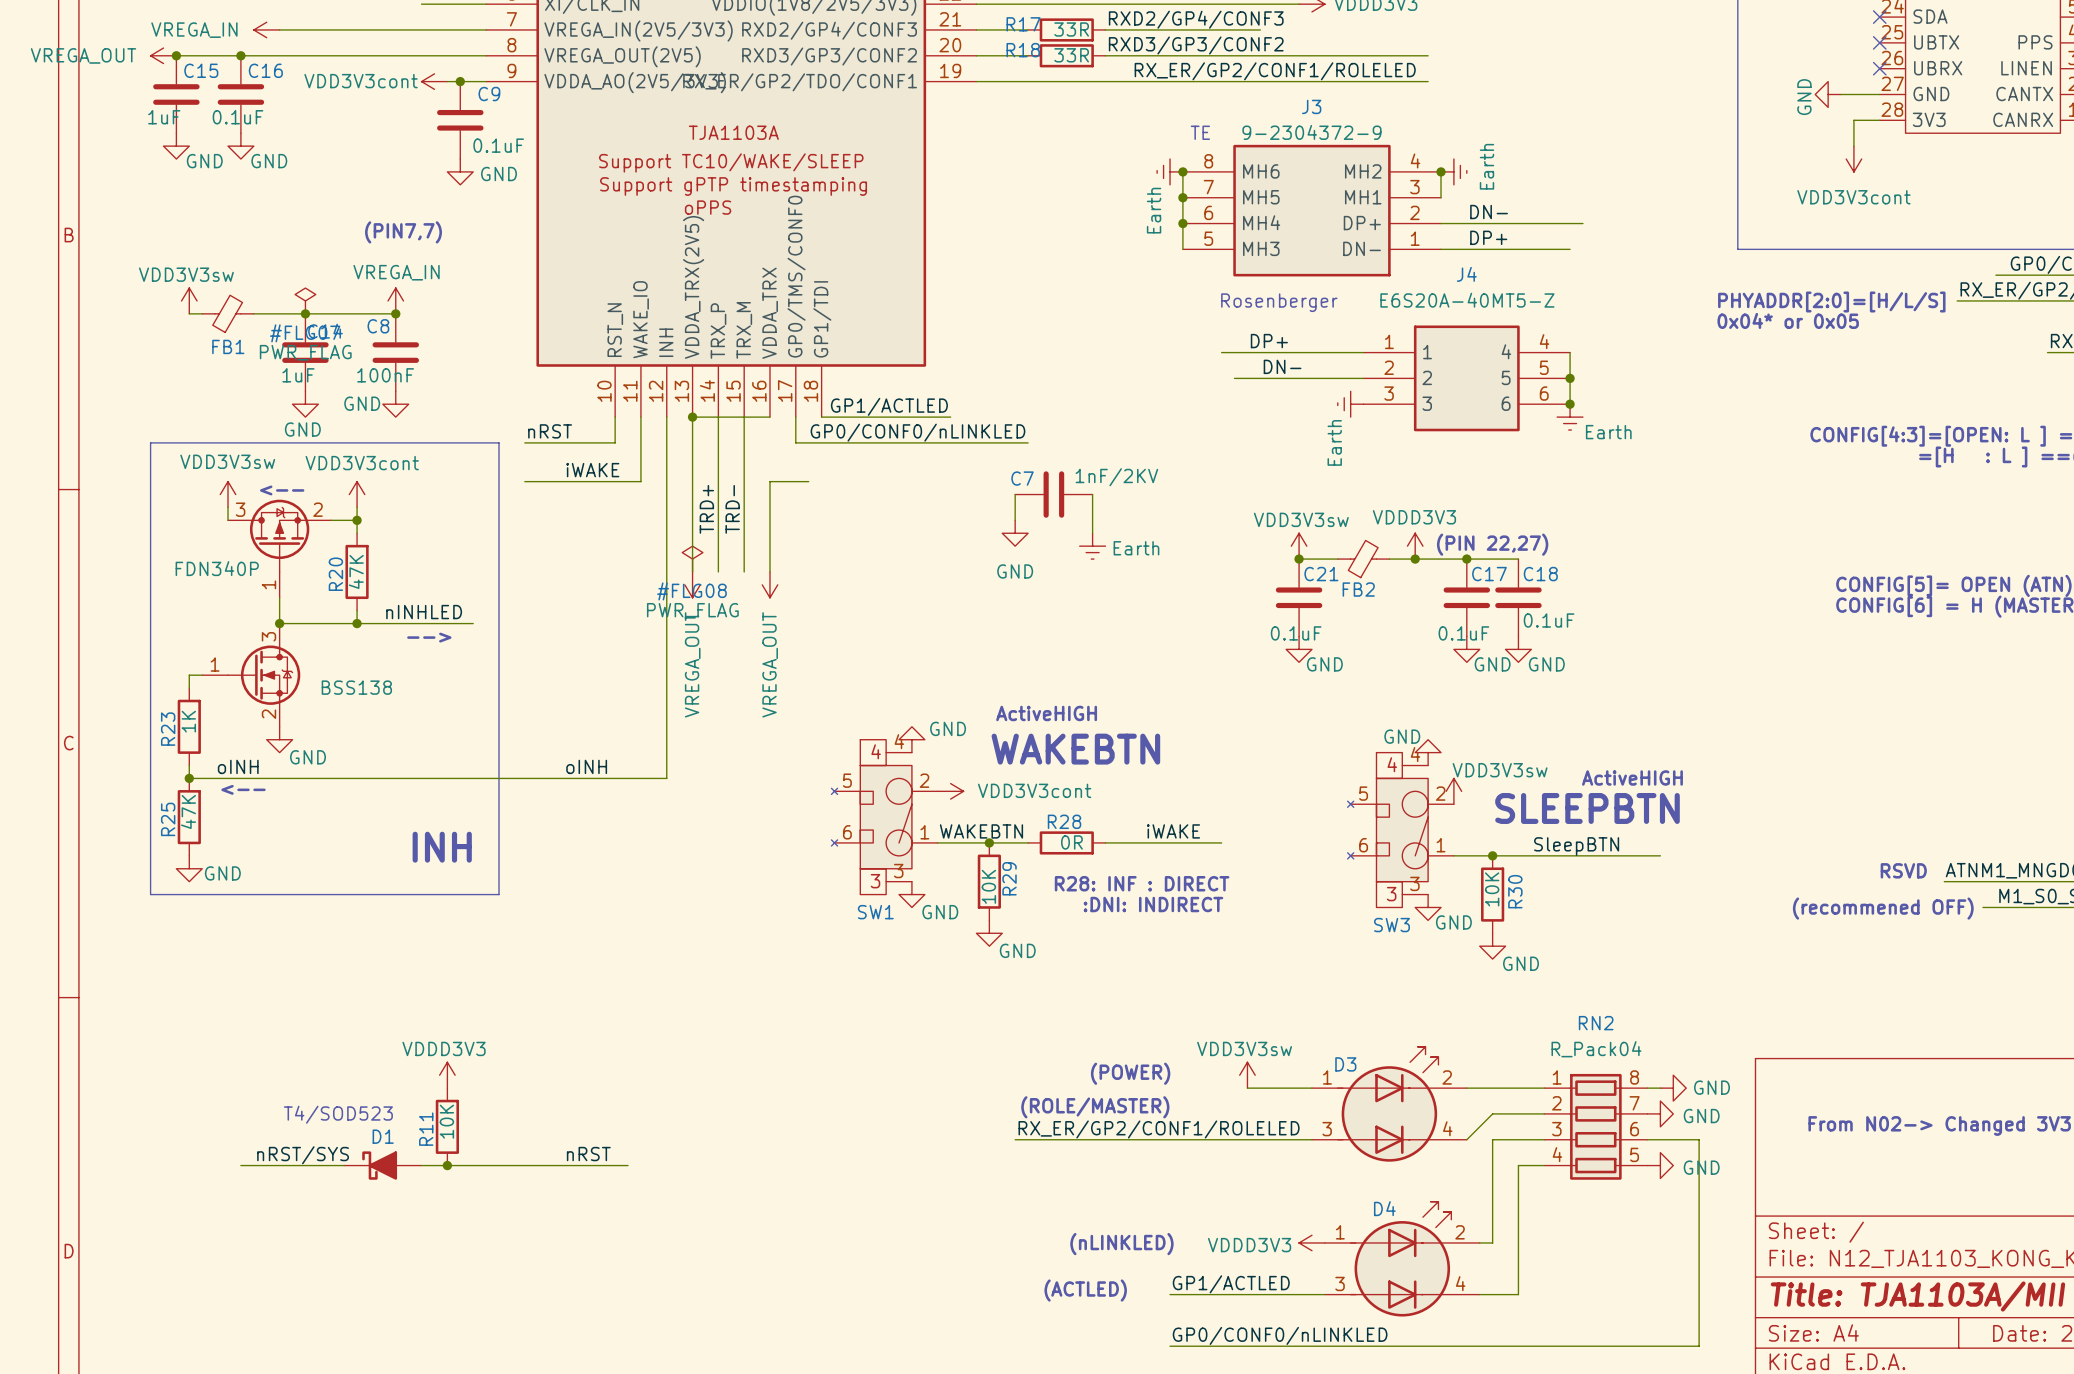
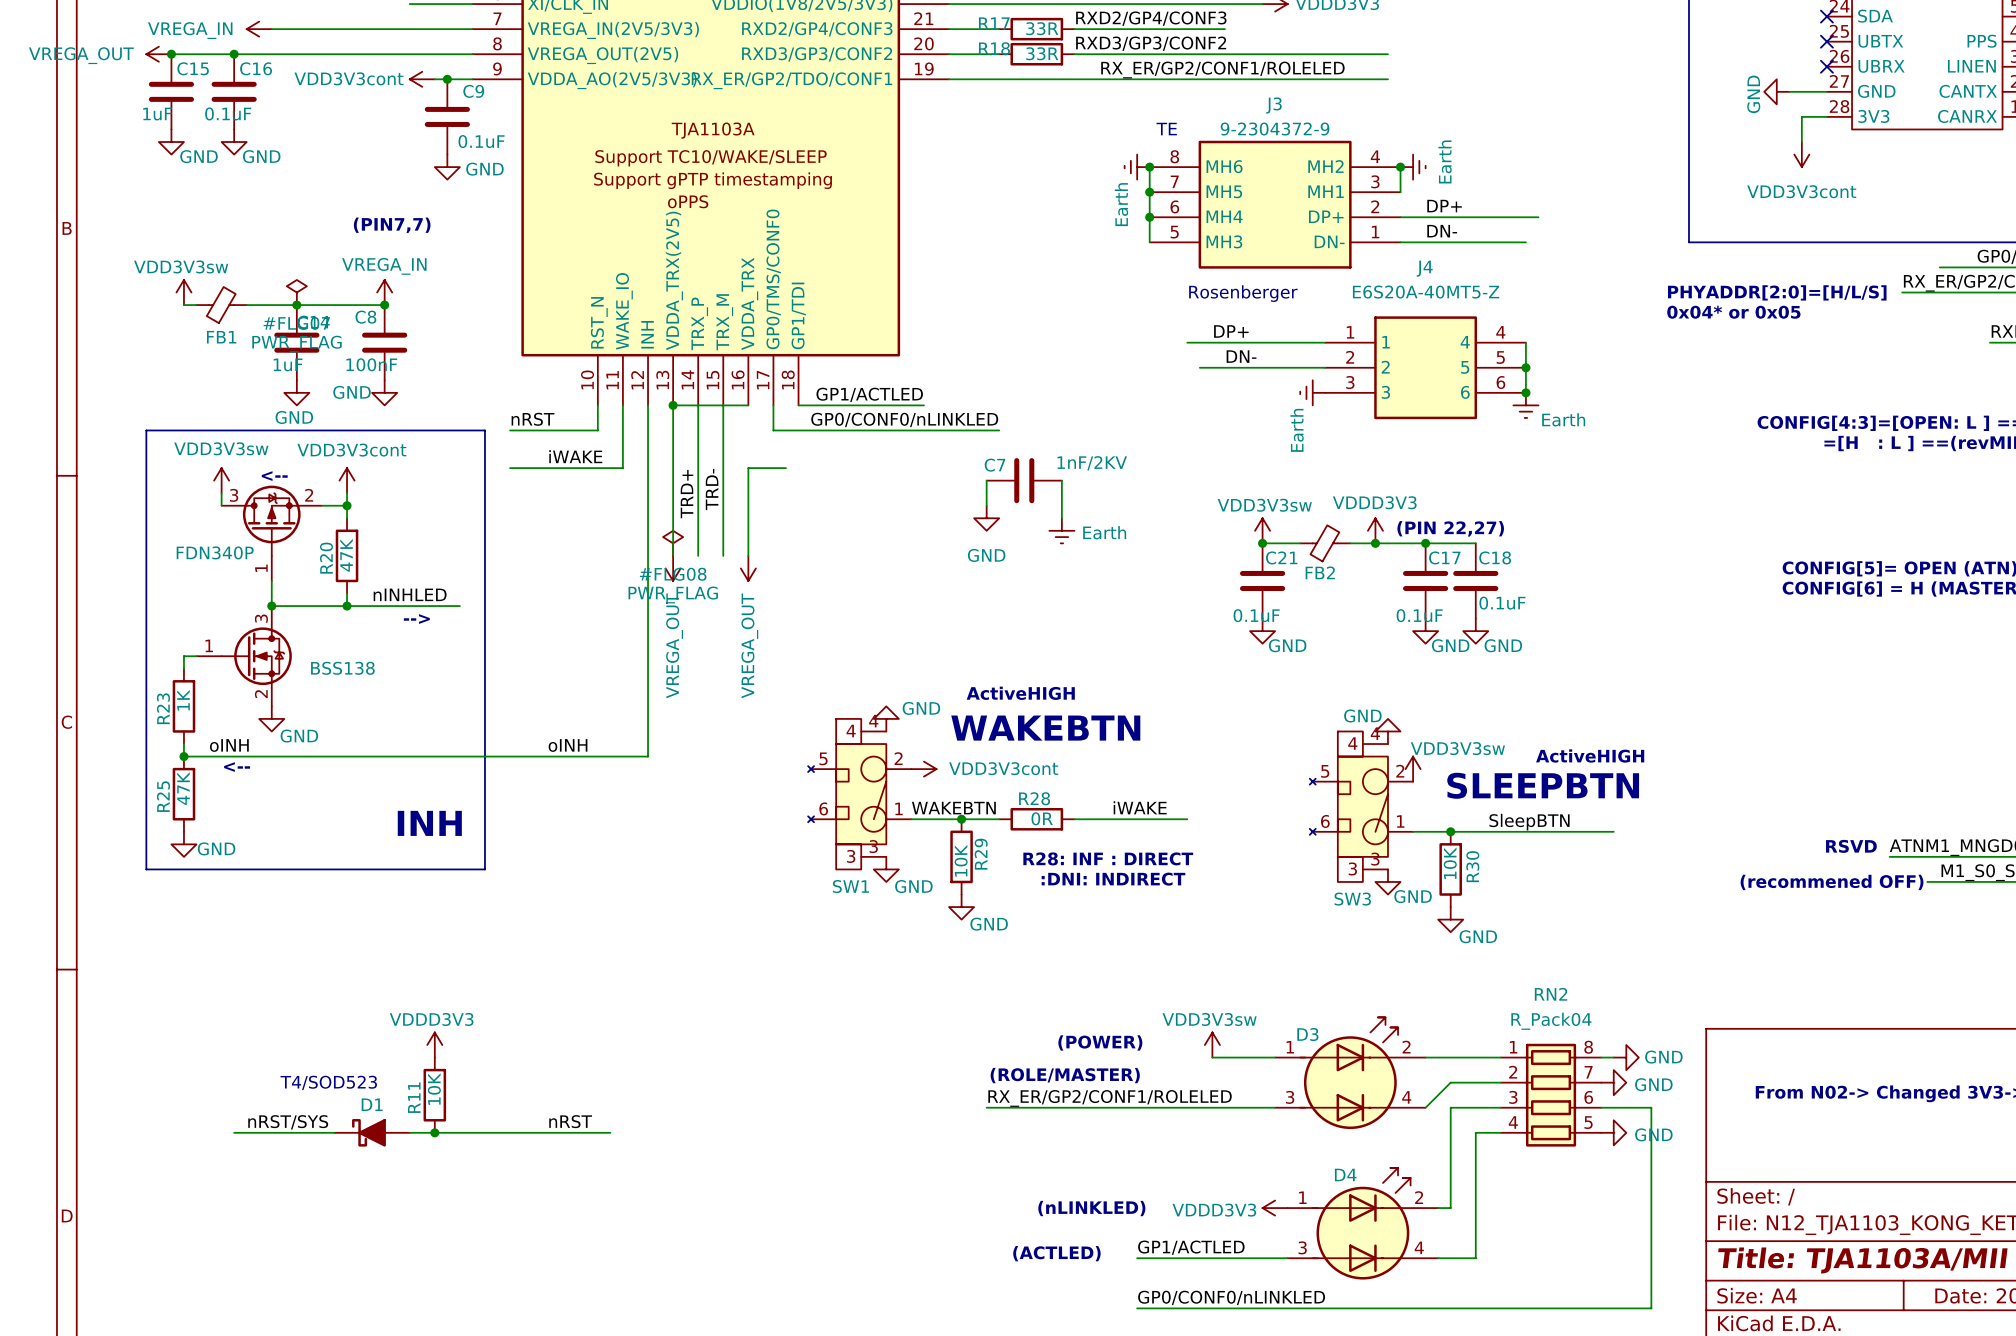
label: DN- (1489, 212) -> DP+ (1444, 206)
label: DP+ (1488, 237) -> DN- (1442, 231)

